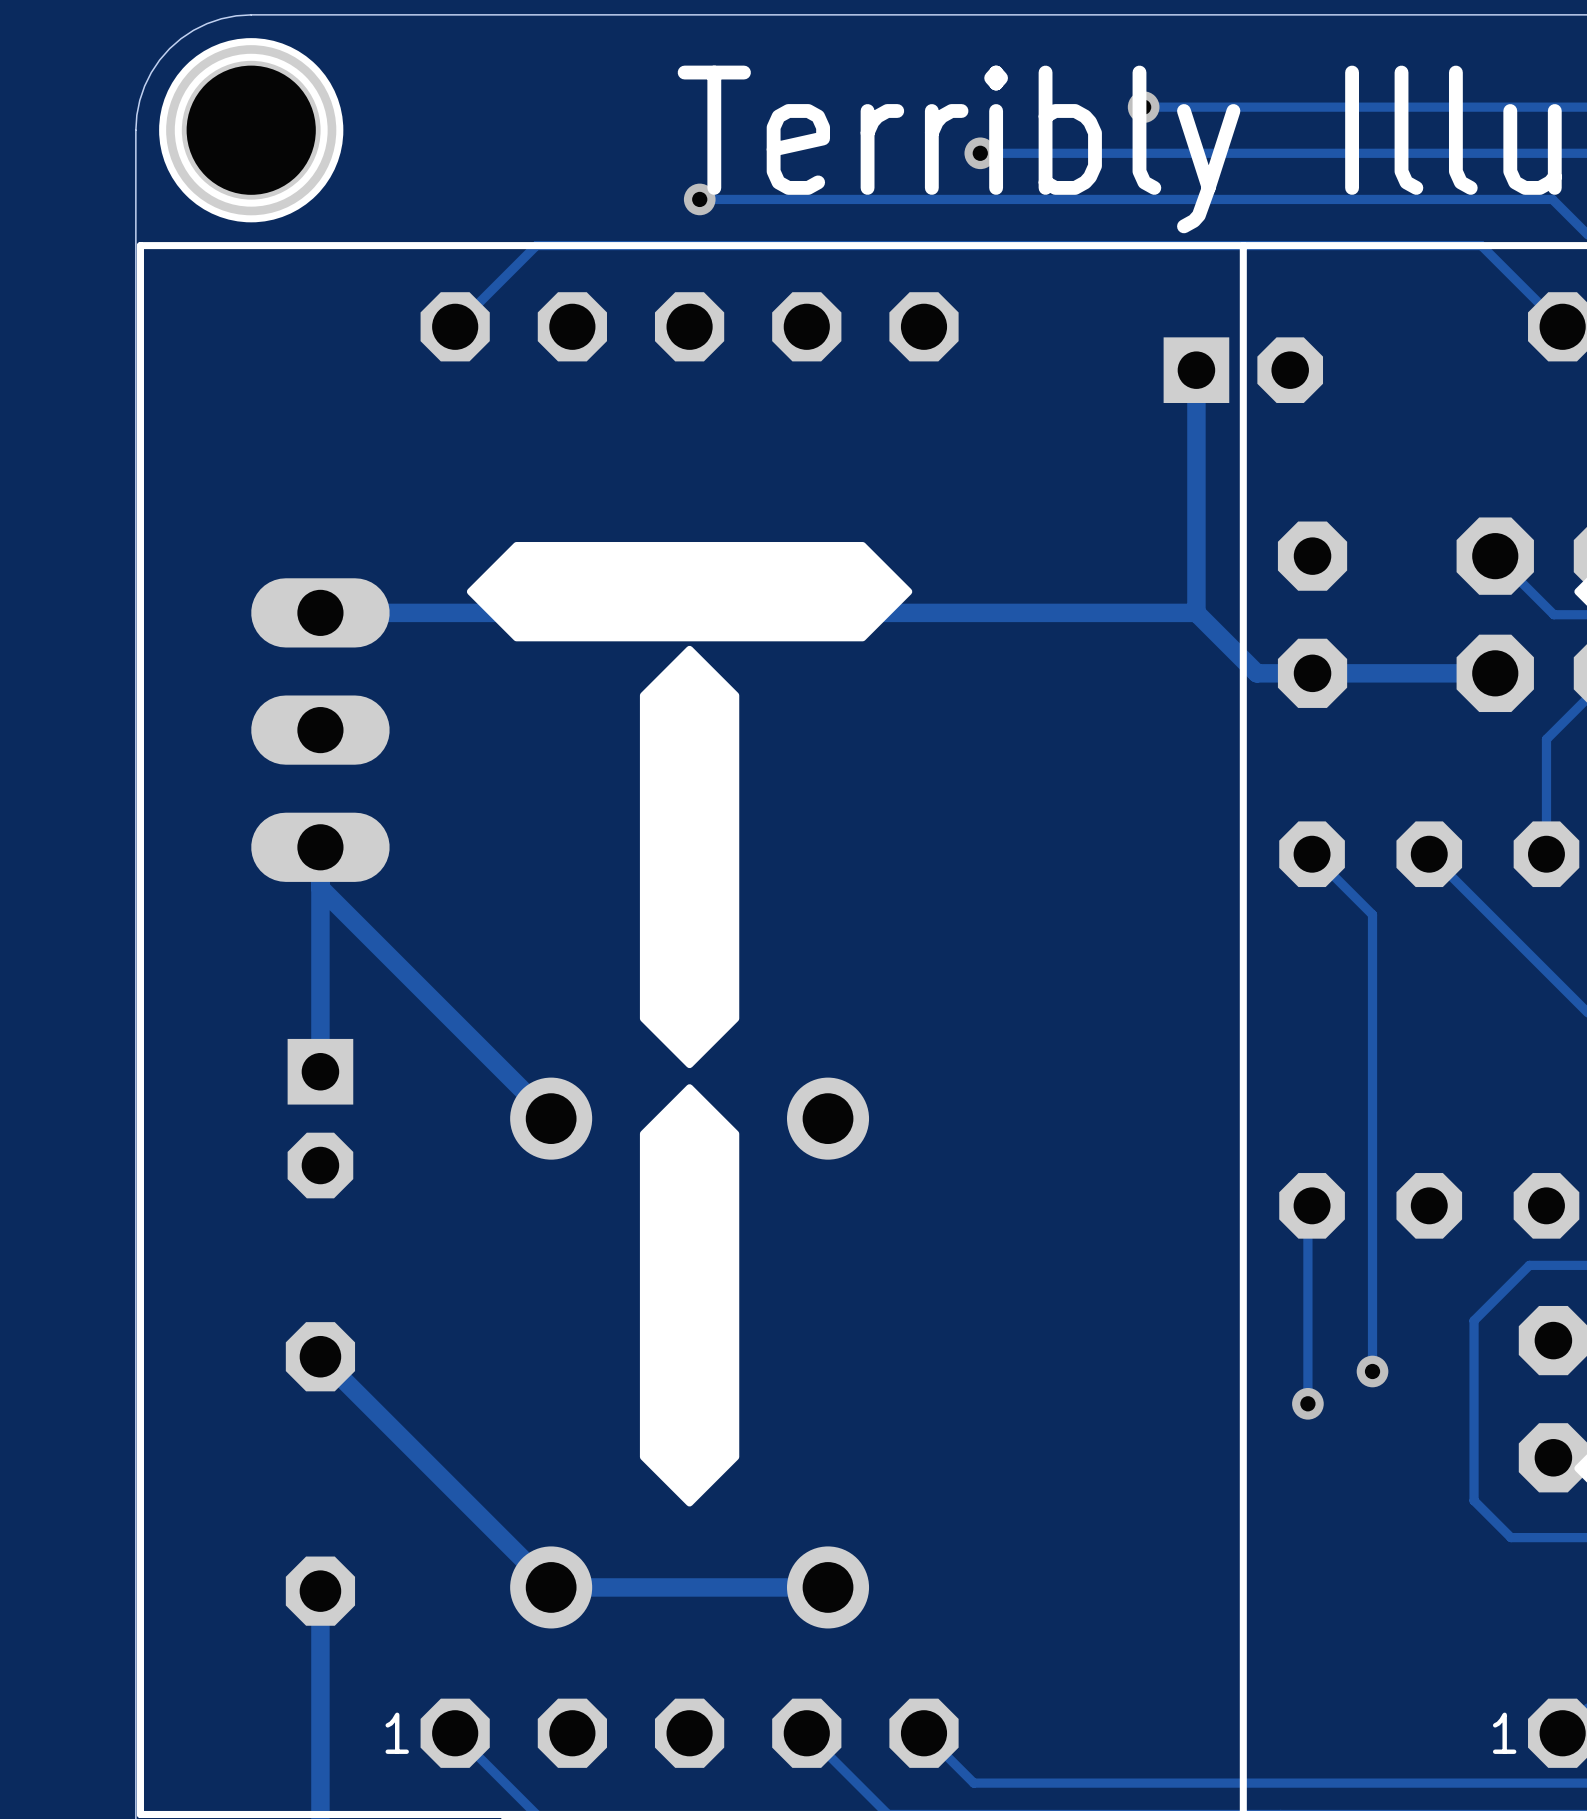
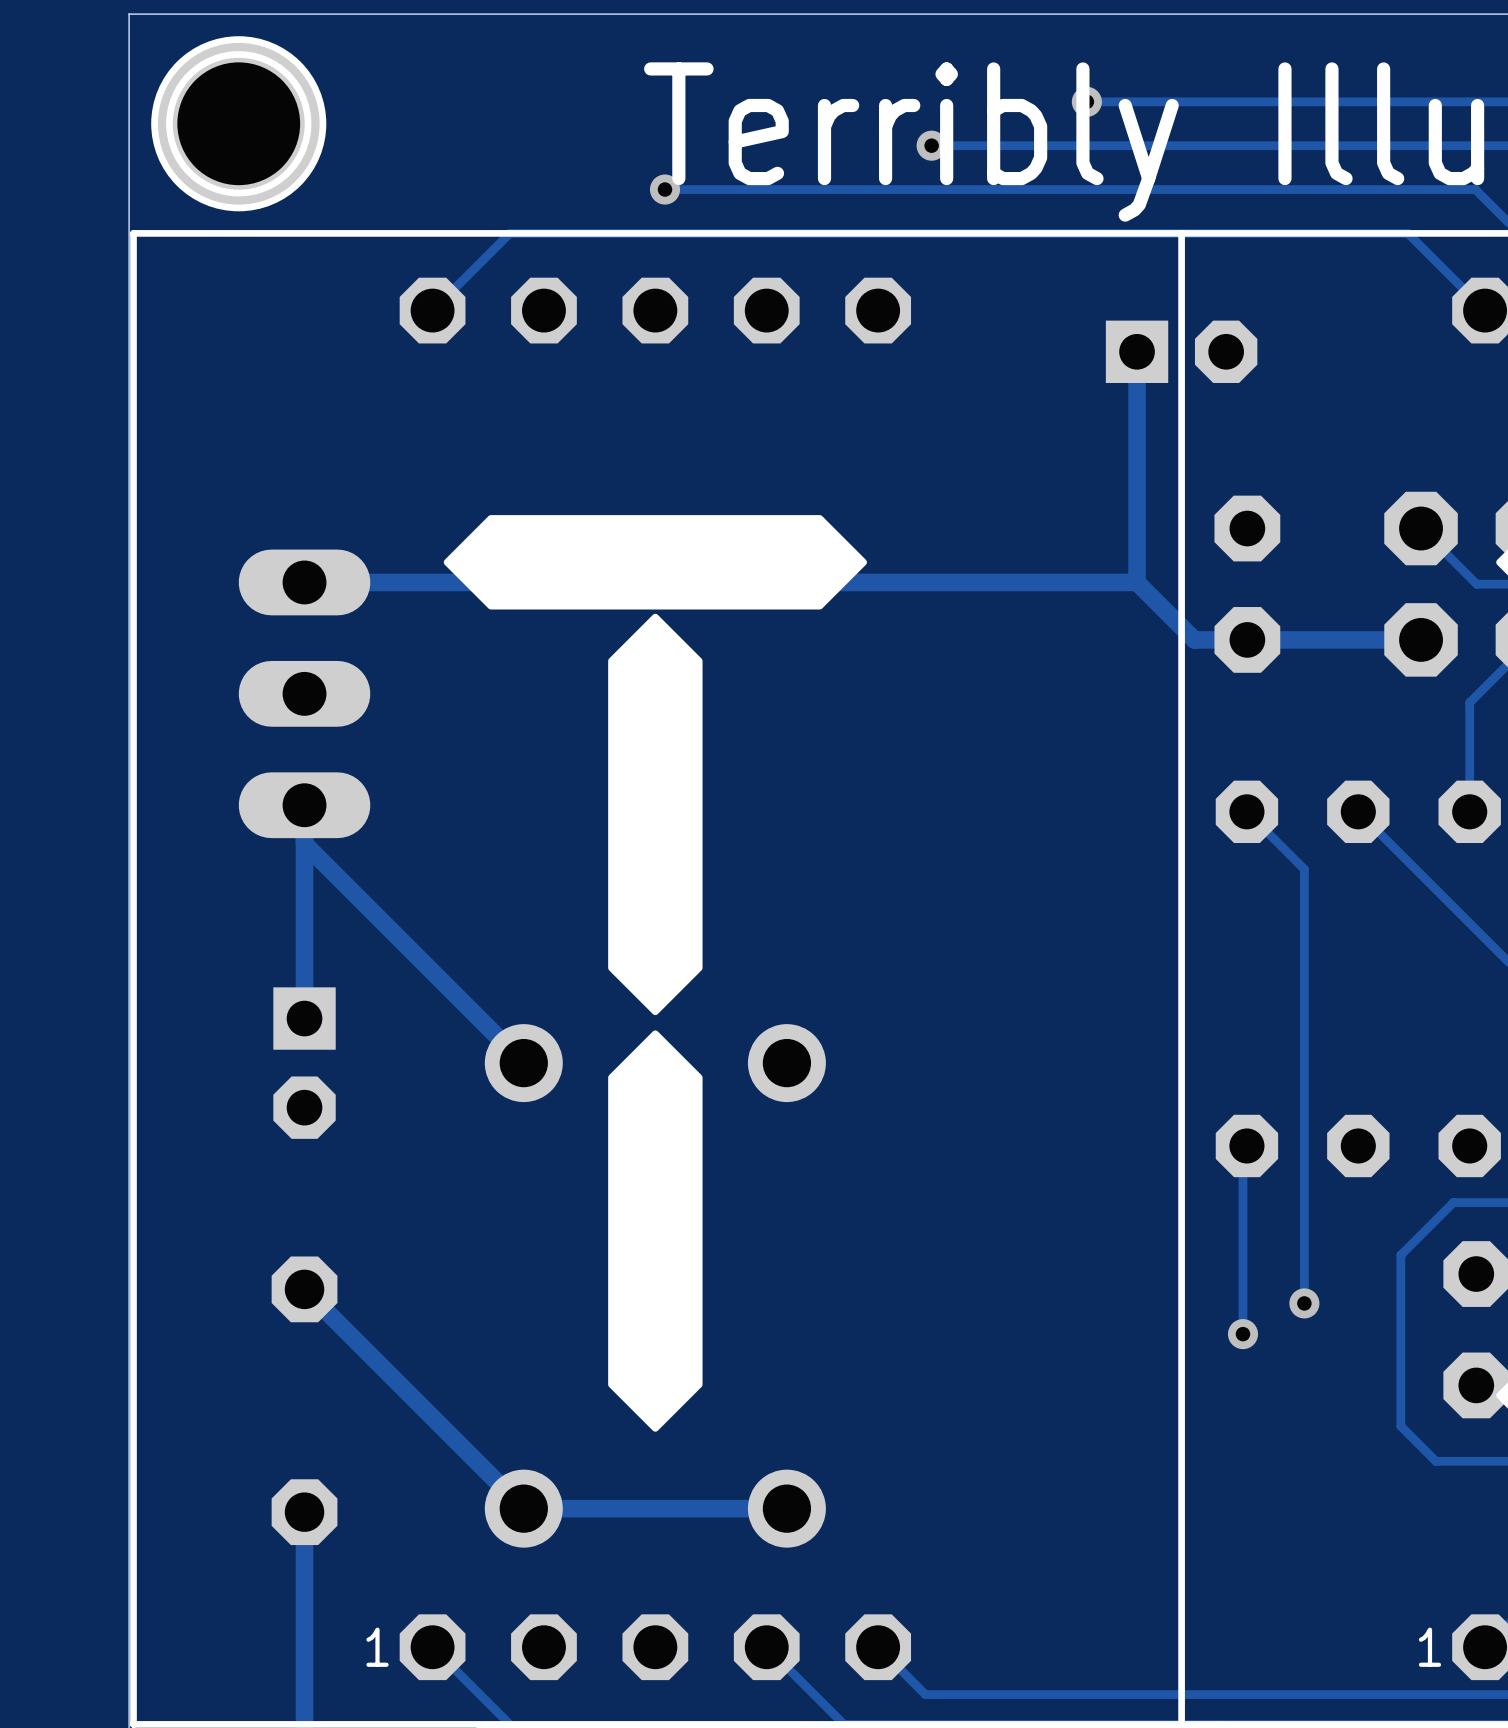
board edge: (251, 14) (236, 15) (207, 23) (193, 30) (169, 48) (151, 72) (144, 86) (136, 115) (135, 130) -> (238, 14) (129, 14) (129, 123)

